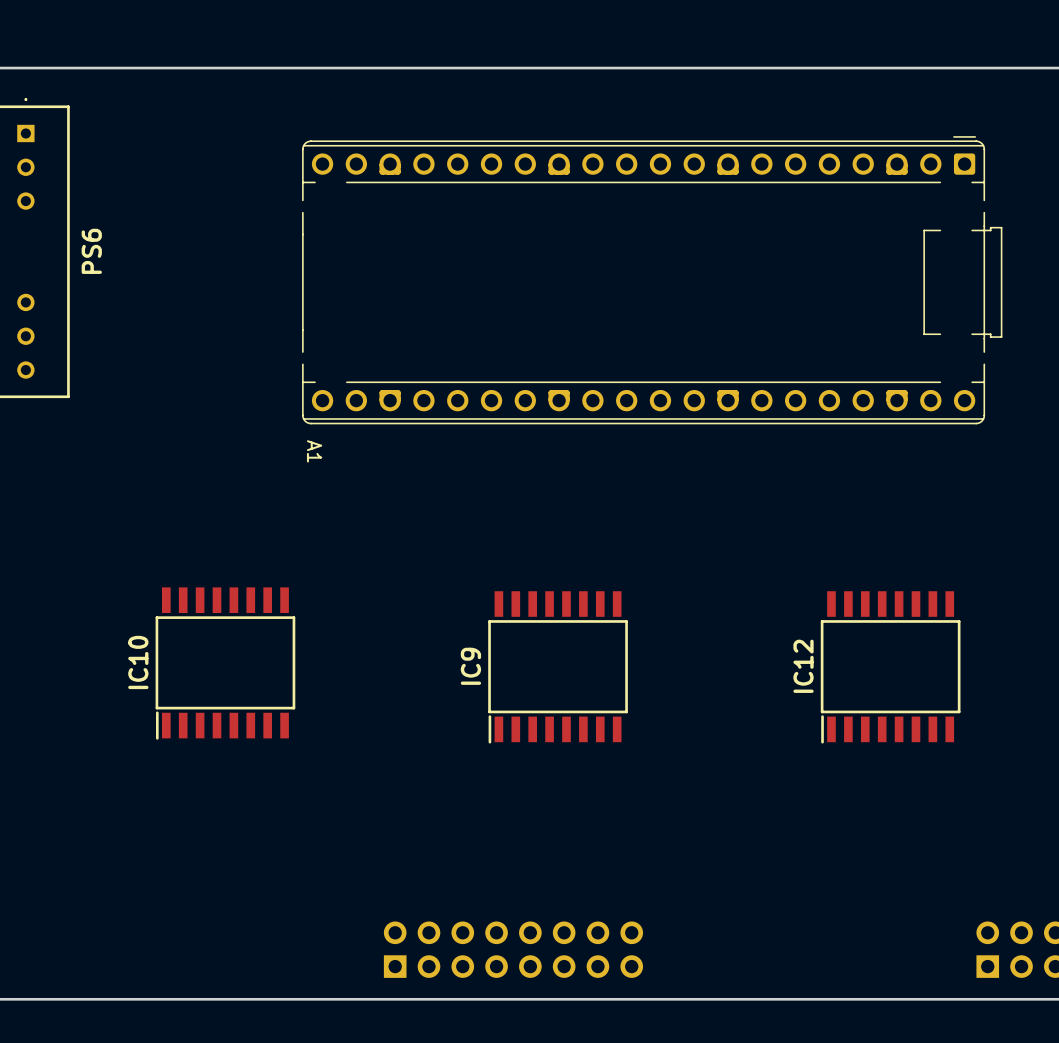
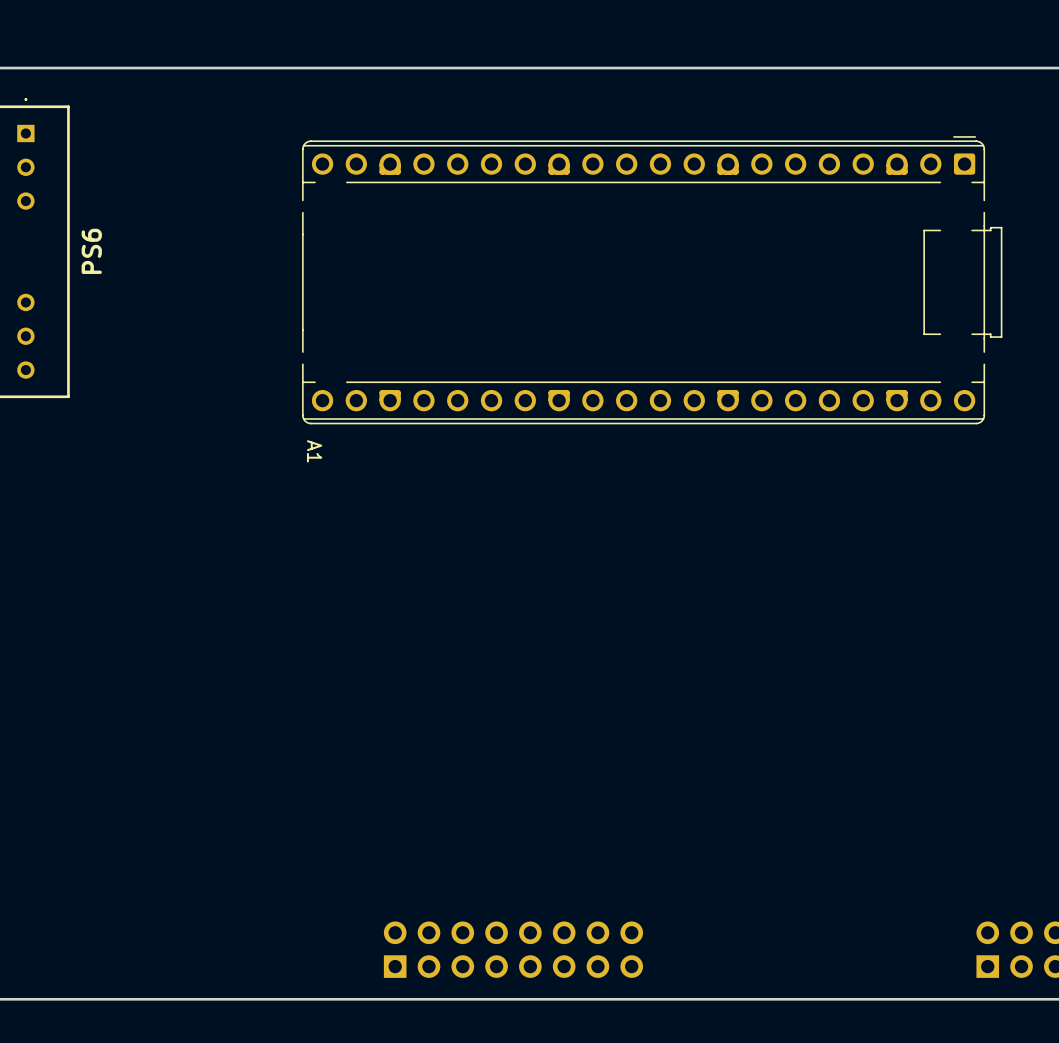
IC10: (225, 663) -> none
IC9: (558, 667) -> none
IC12: (890, 667) -> none

